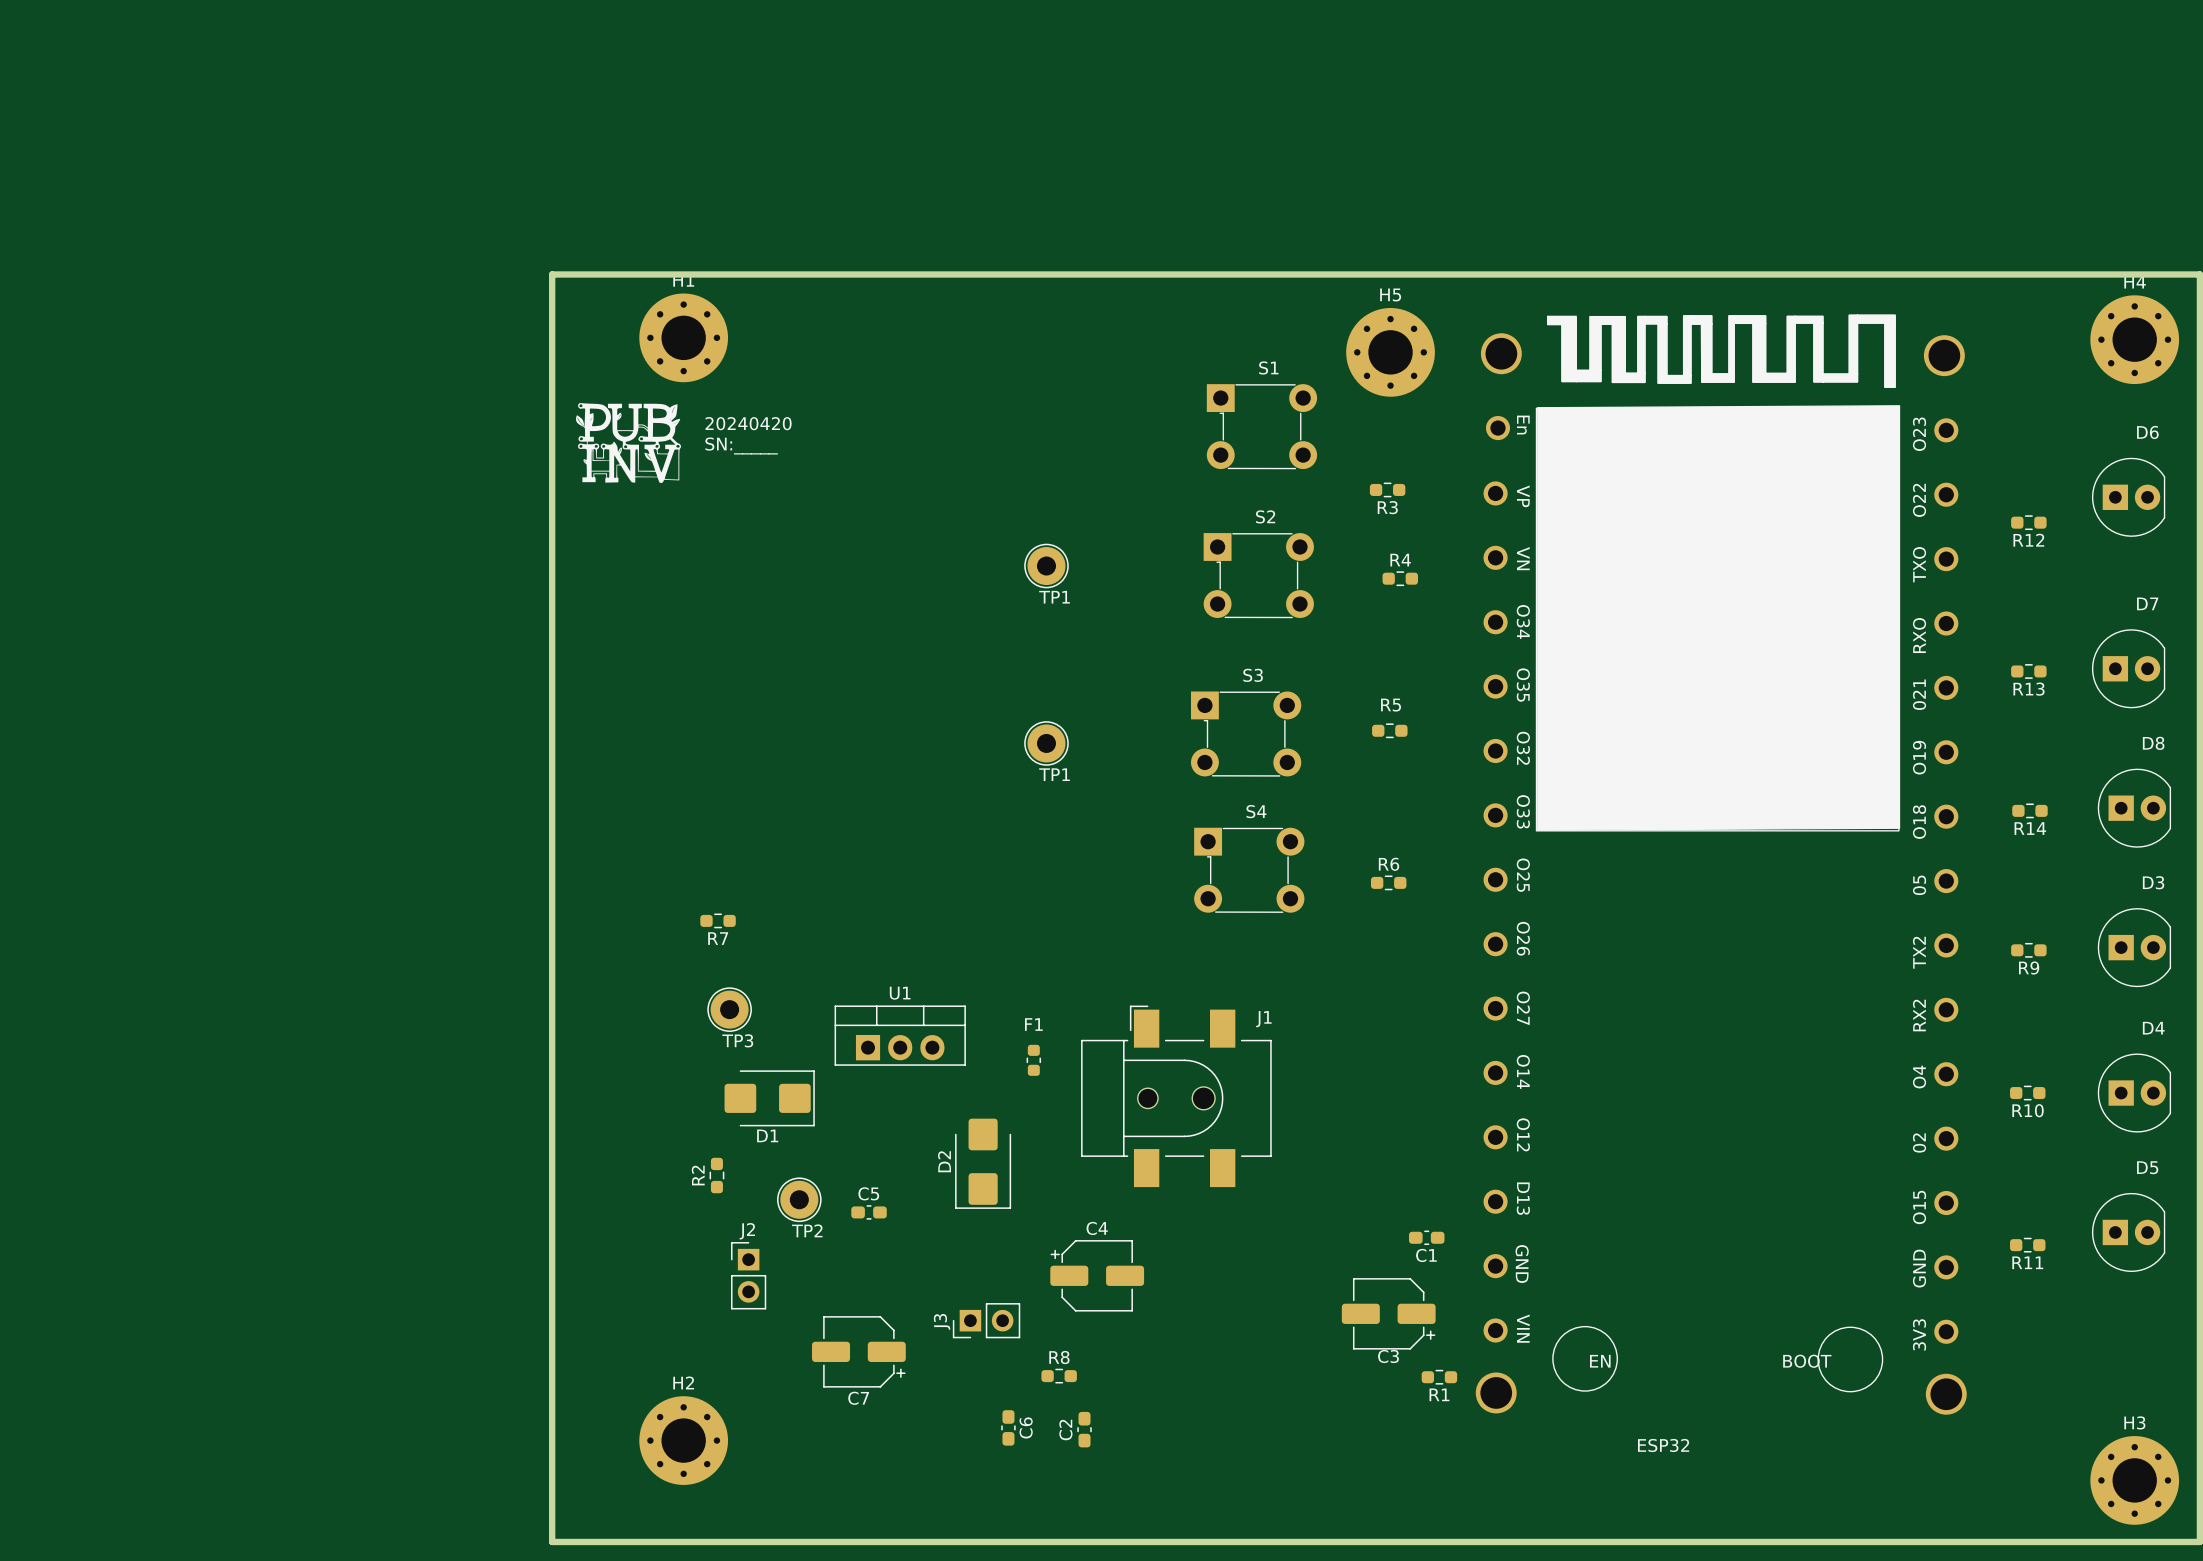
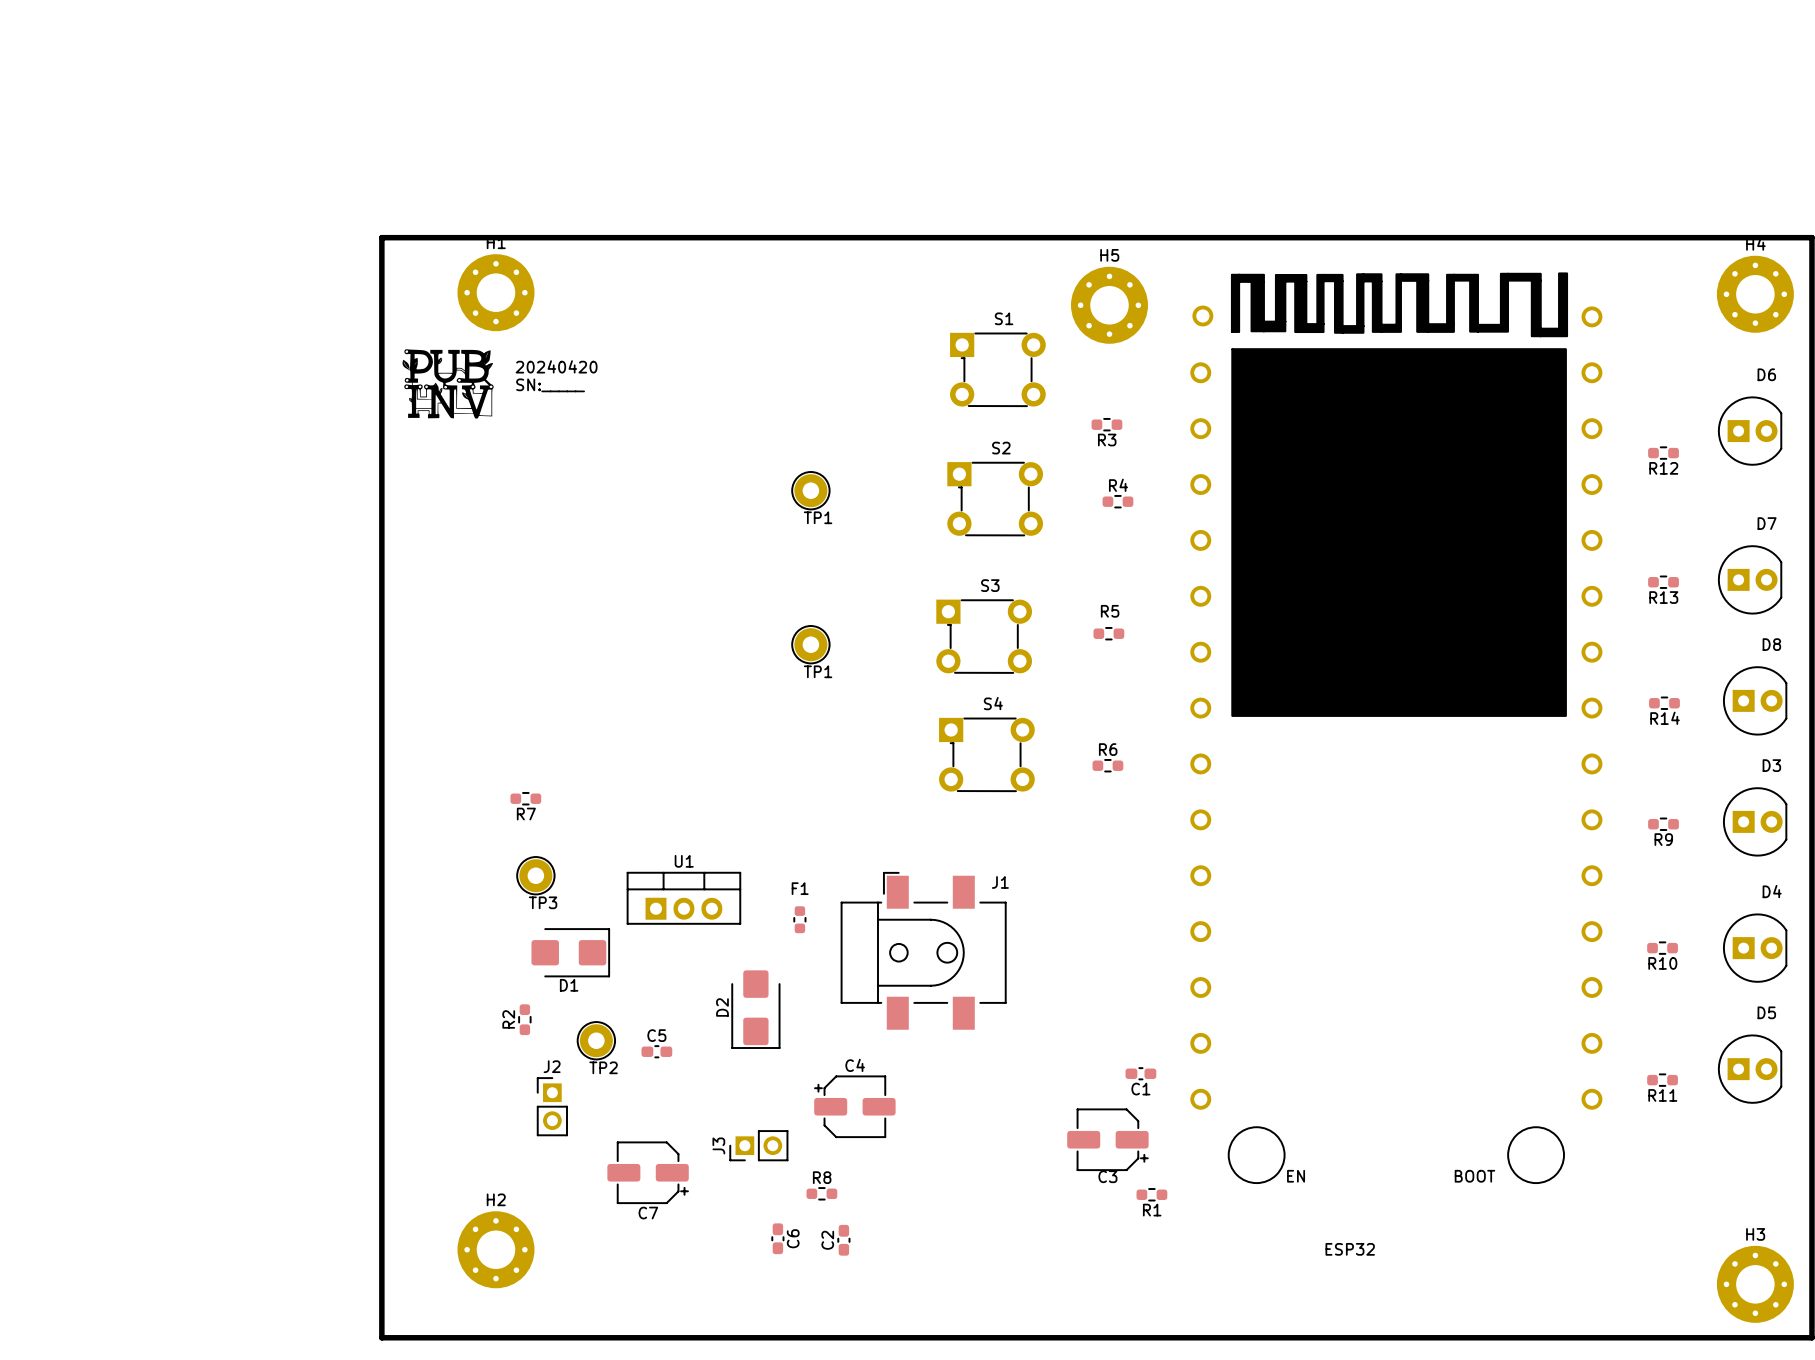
ESP32 footprint: [1475, 314, 1967, 1415] -> [1190, 272, 1603, 1184]

